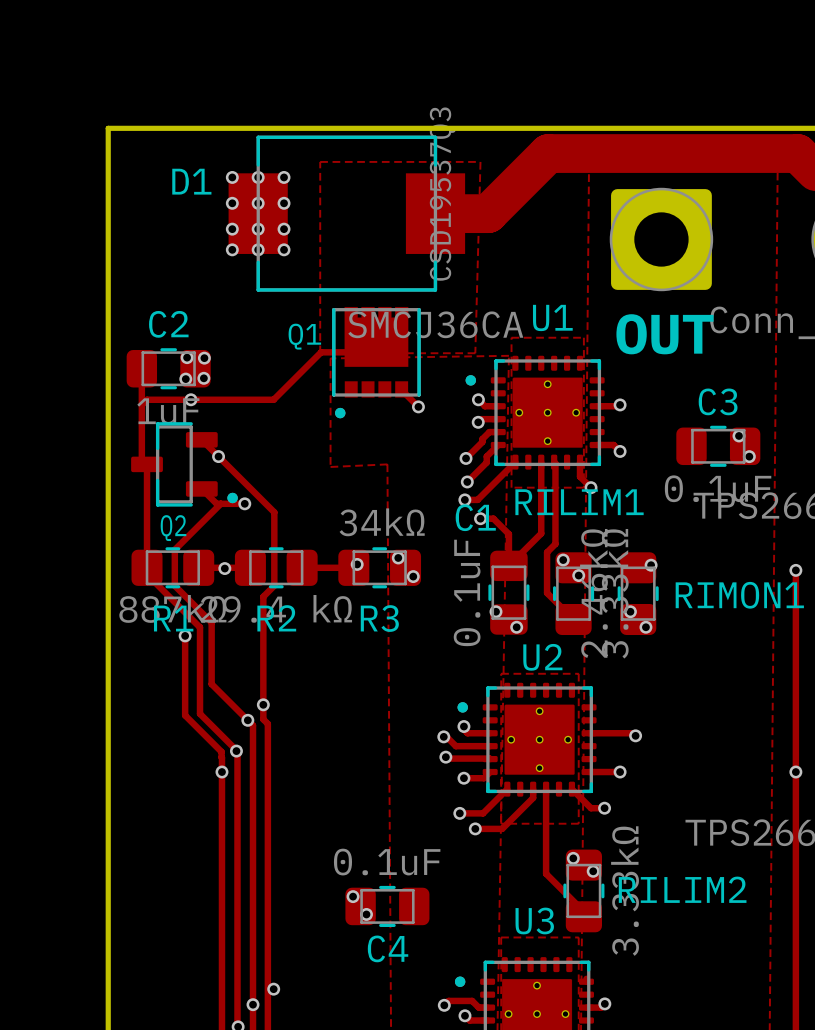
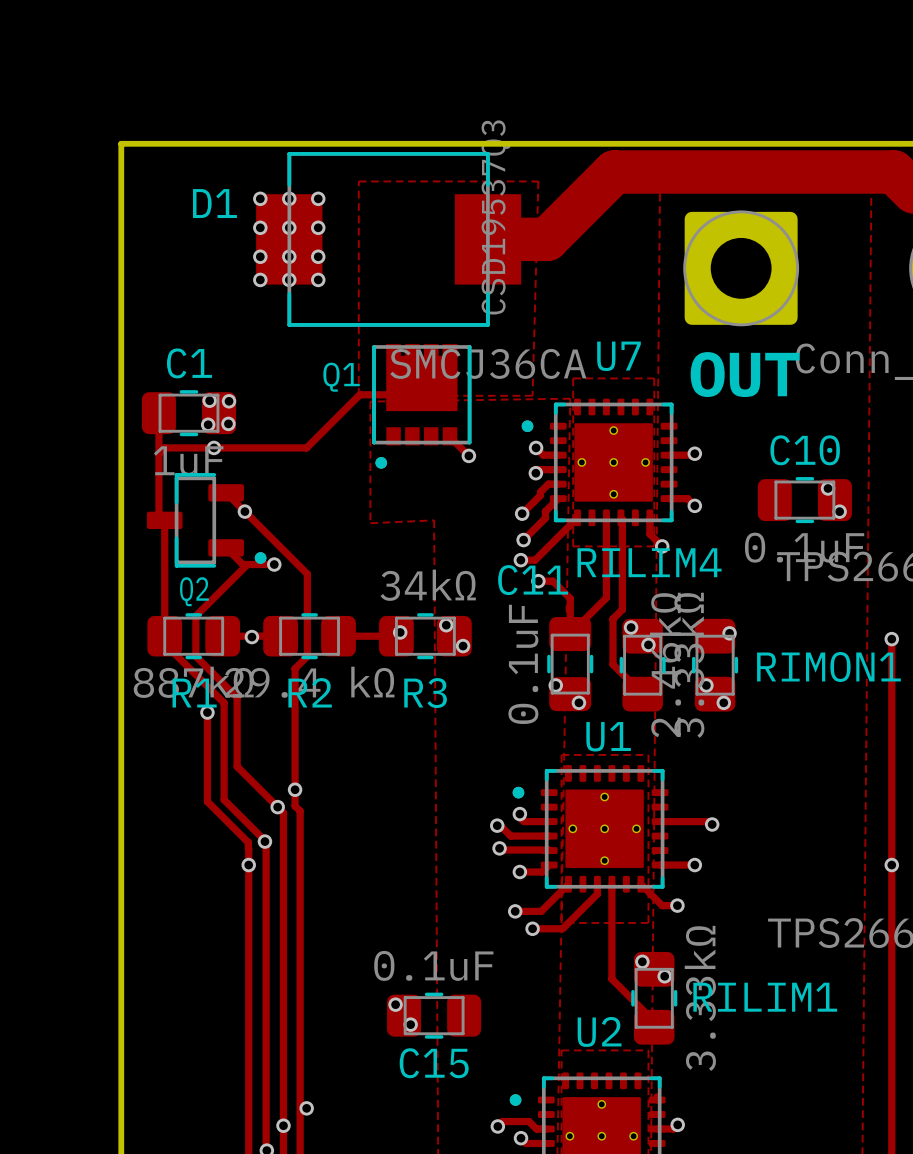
U1 name: U1 (552, 317) -> U7 (618, 356)
C2 name: C2 (168, 324) -> C1 (189, 363)
C3 name: C3 (718, 401) -> C10 (805, 450)
RILIM1 name: RILIM1 (579, 502) -> RILIM4 (649, 562)
C1 name: C1 (475, 517) -> C11 (533, 580)
U2 name: U2 (542, 657) -> U1 (608, 736)
RILIM2 name: RILIM2 (682, 889) -> RILIM1 (765, 997)
U3 name: U3 (534, 920) -> U2 (599, 1031)
C4 name: C4 (388, 948) -> C15 (434, 1063)

